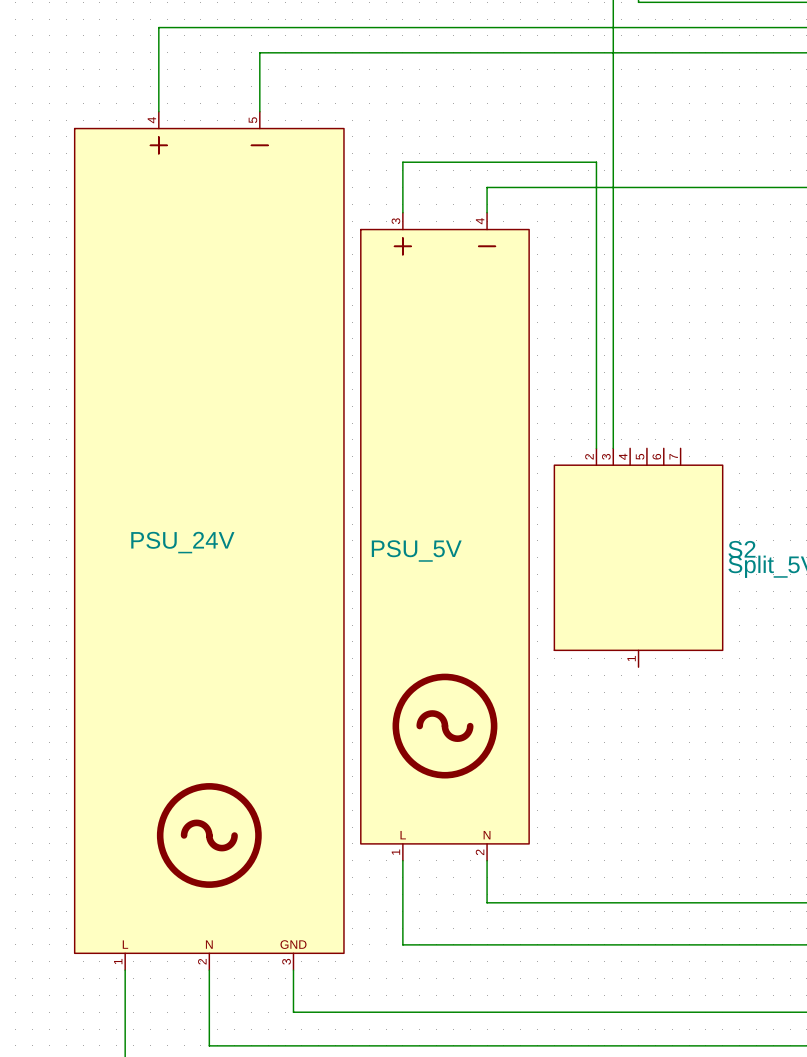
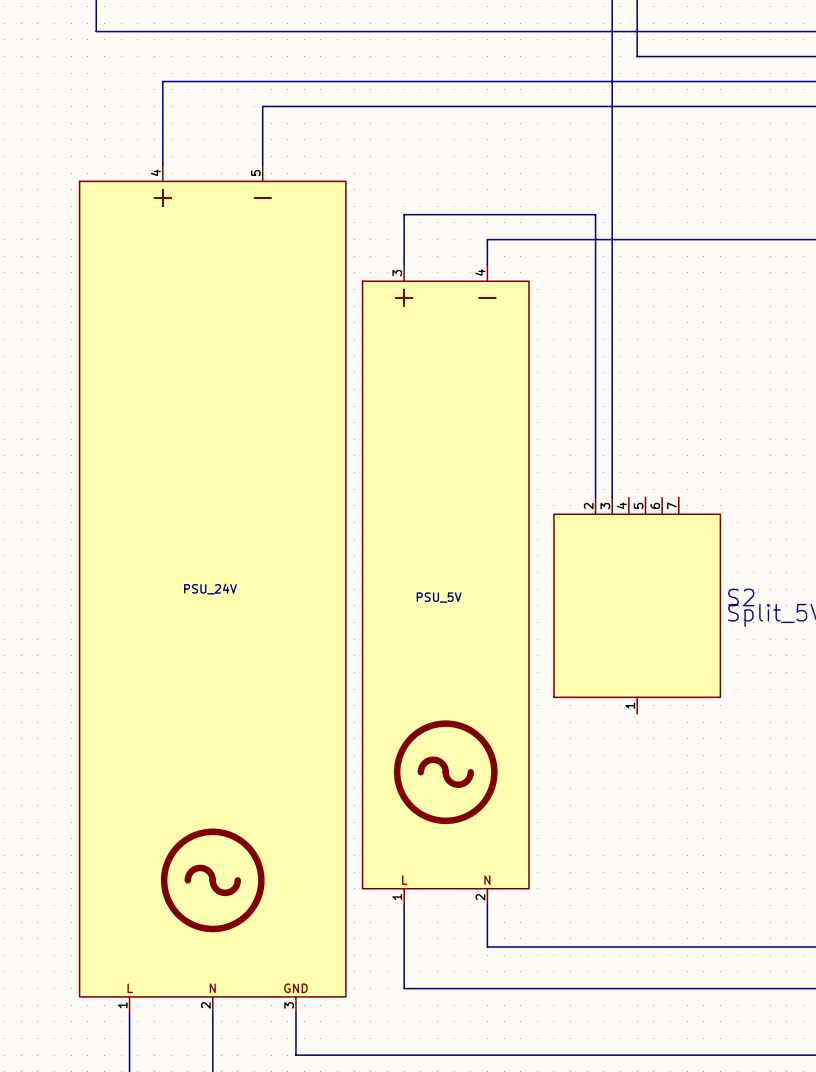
drawing shape: [74, 111, 344, 971] -> [79, 164, 346, 1014]
drawing shape: [360, 212, 530, 861] -> [362, 264, 529, 906]

